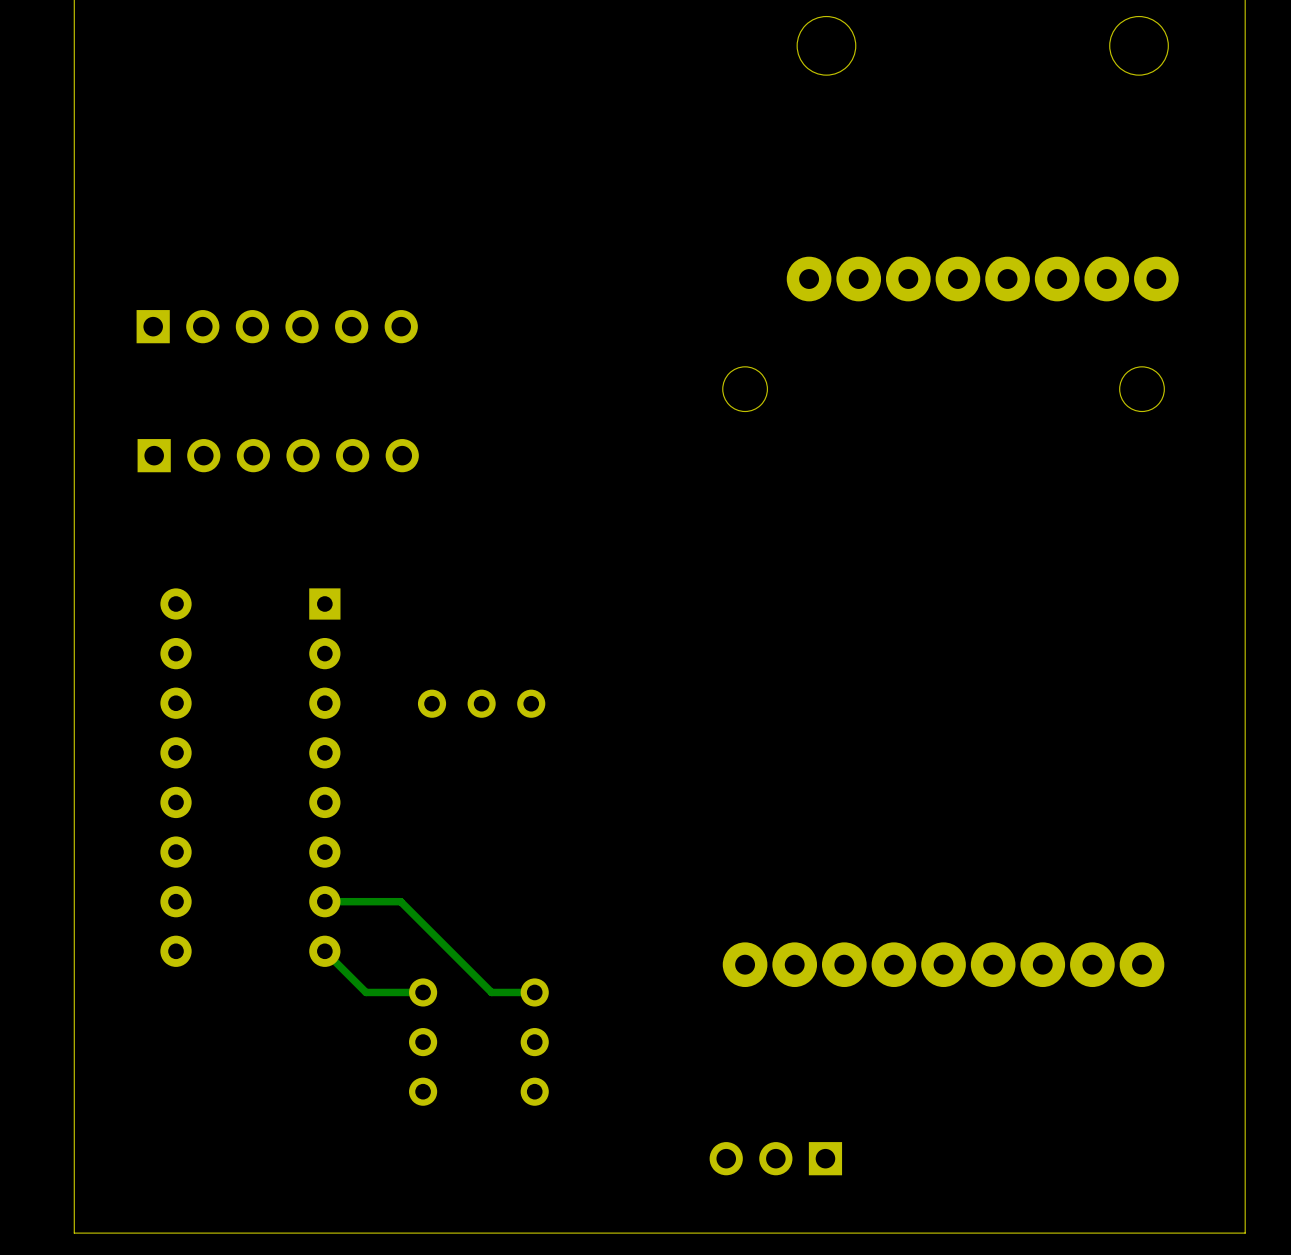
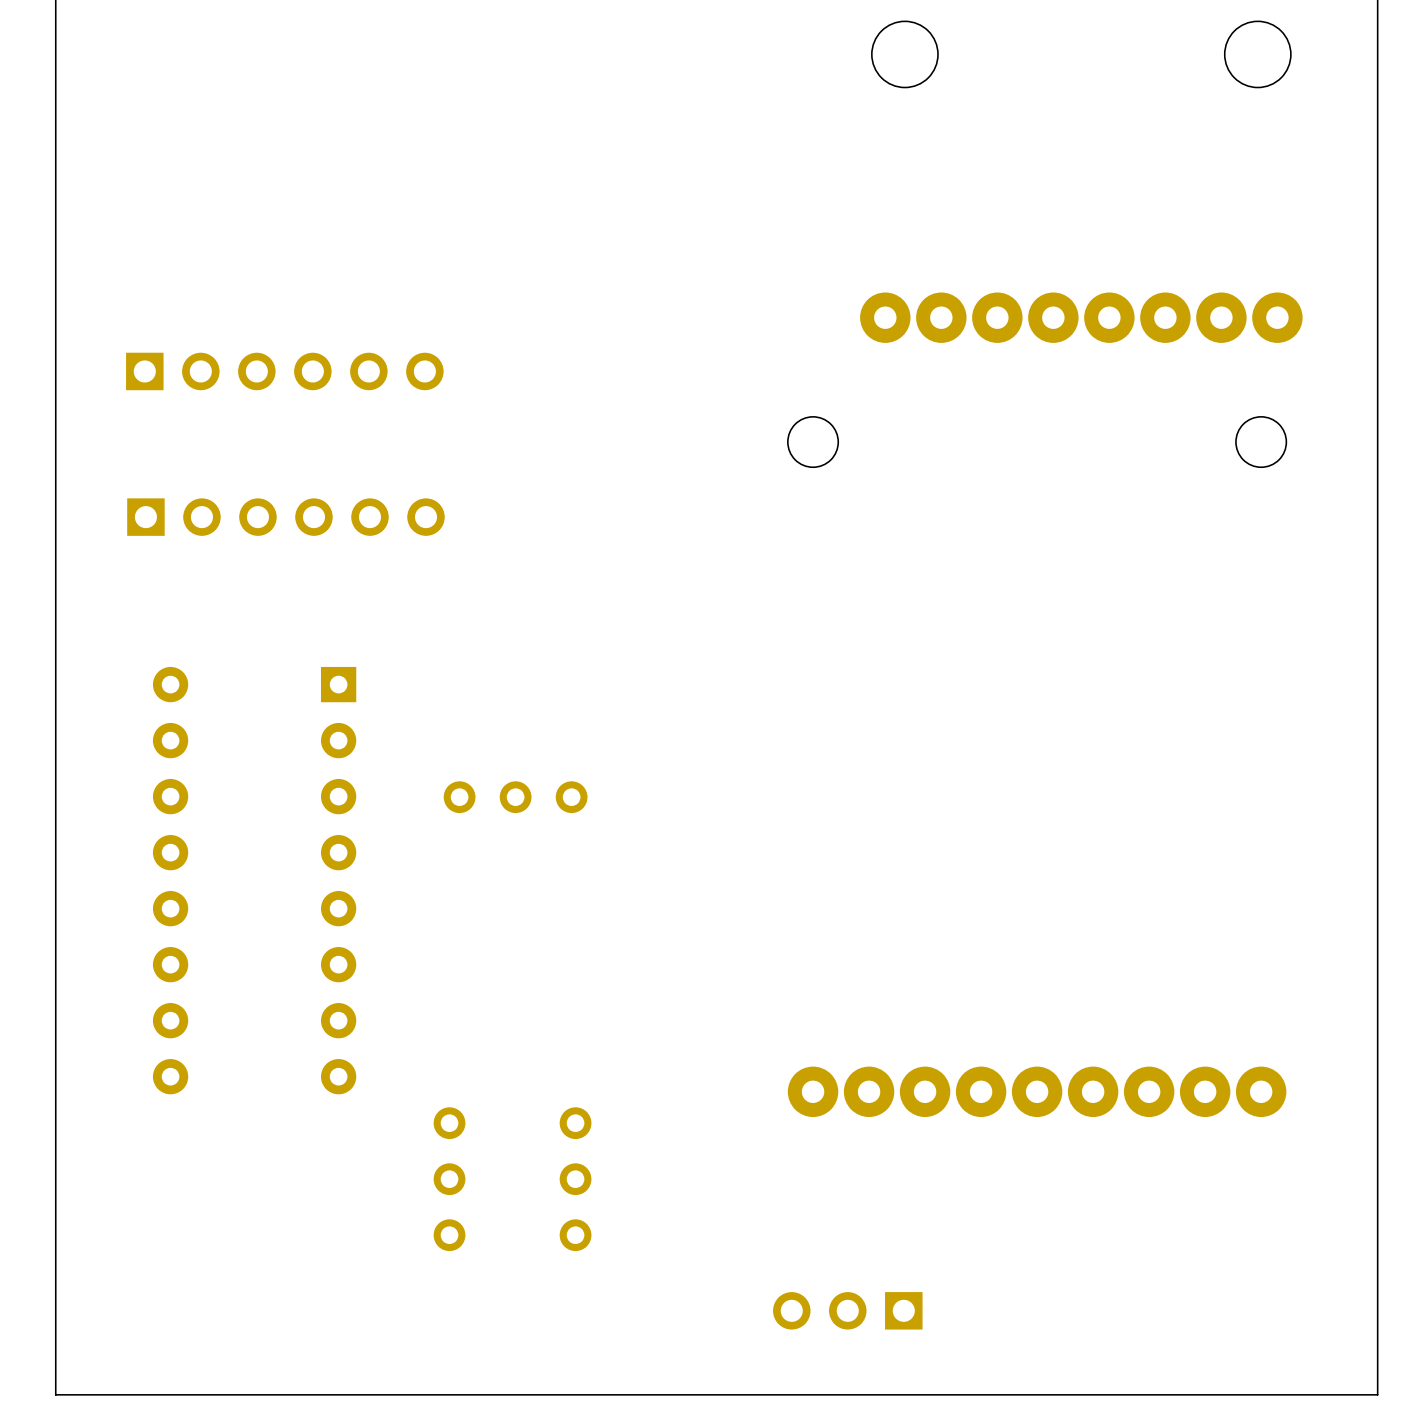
track: (324, 901) (400, 901) (491, 992) (534, 992) -> none
track: (324, 951) (366, 992) (423, 992) -> none

